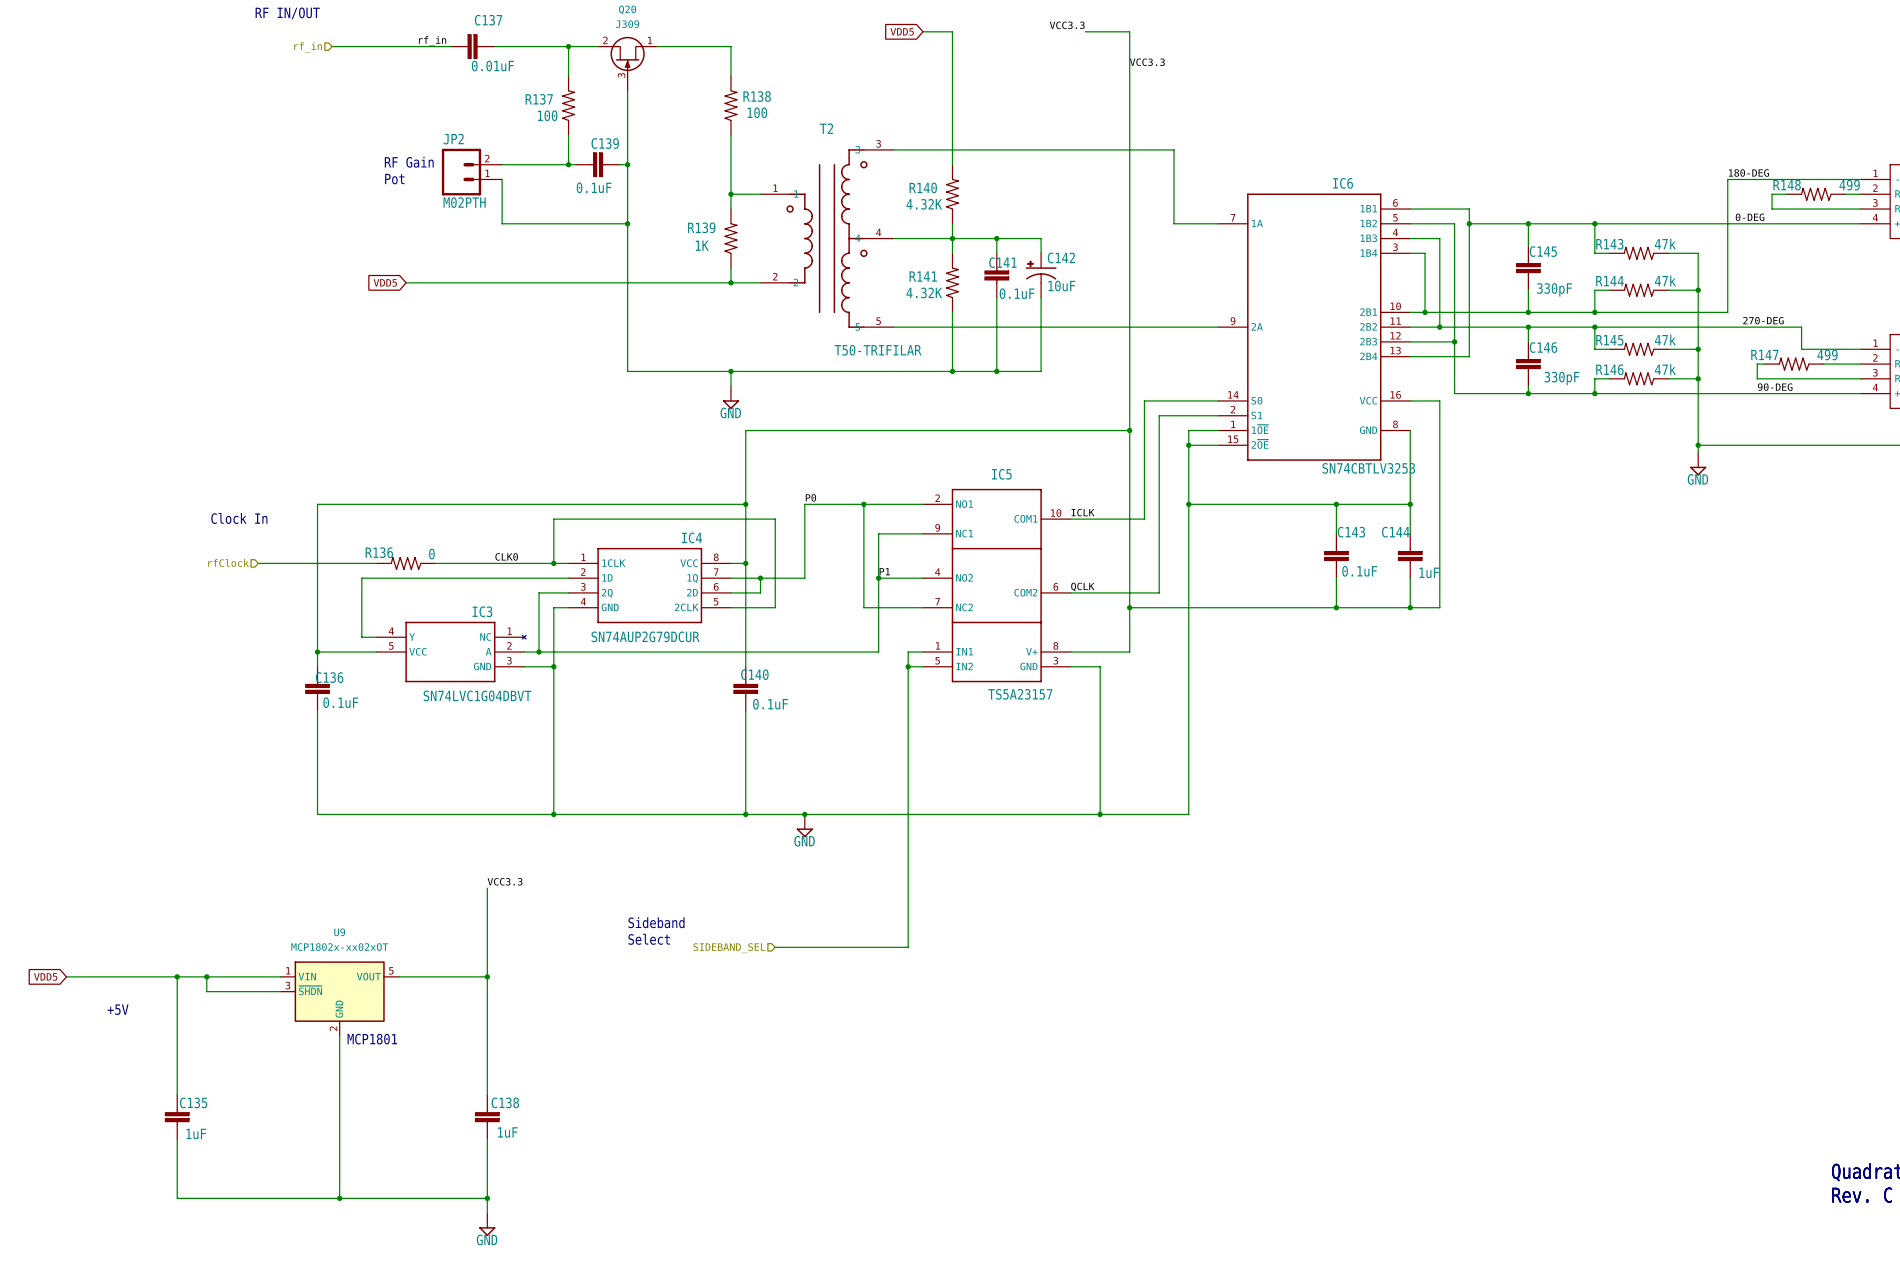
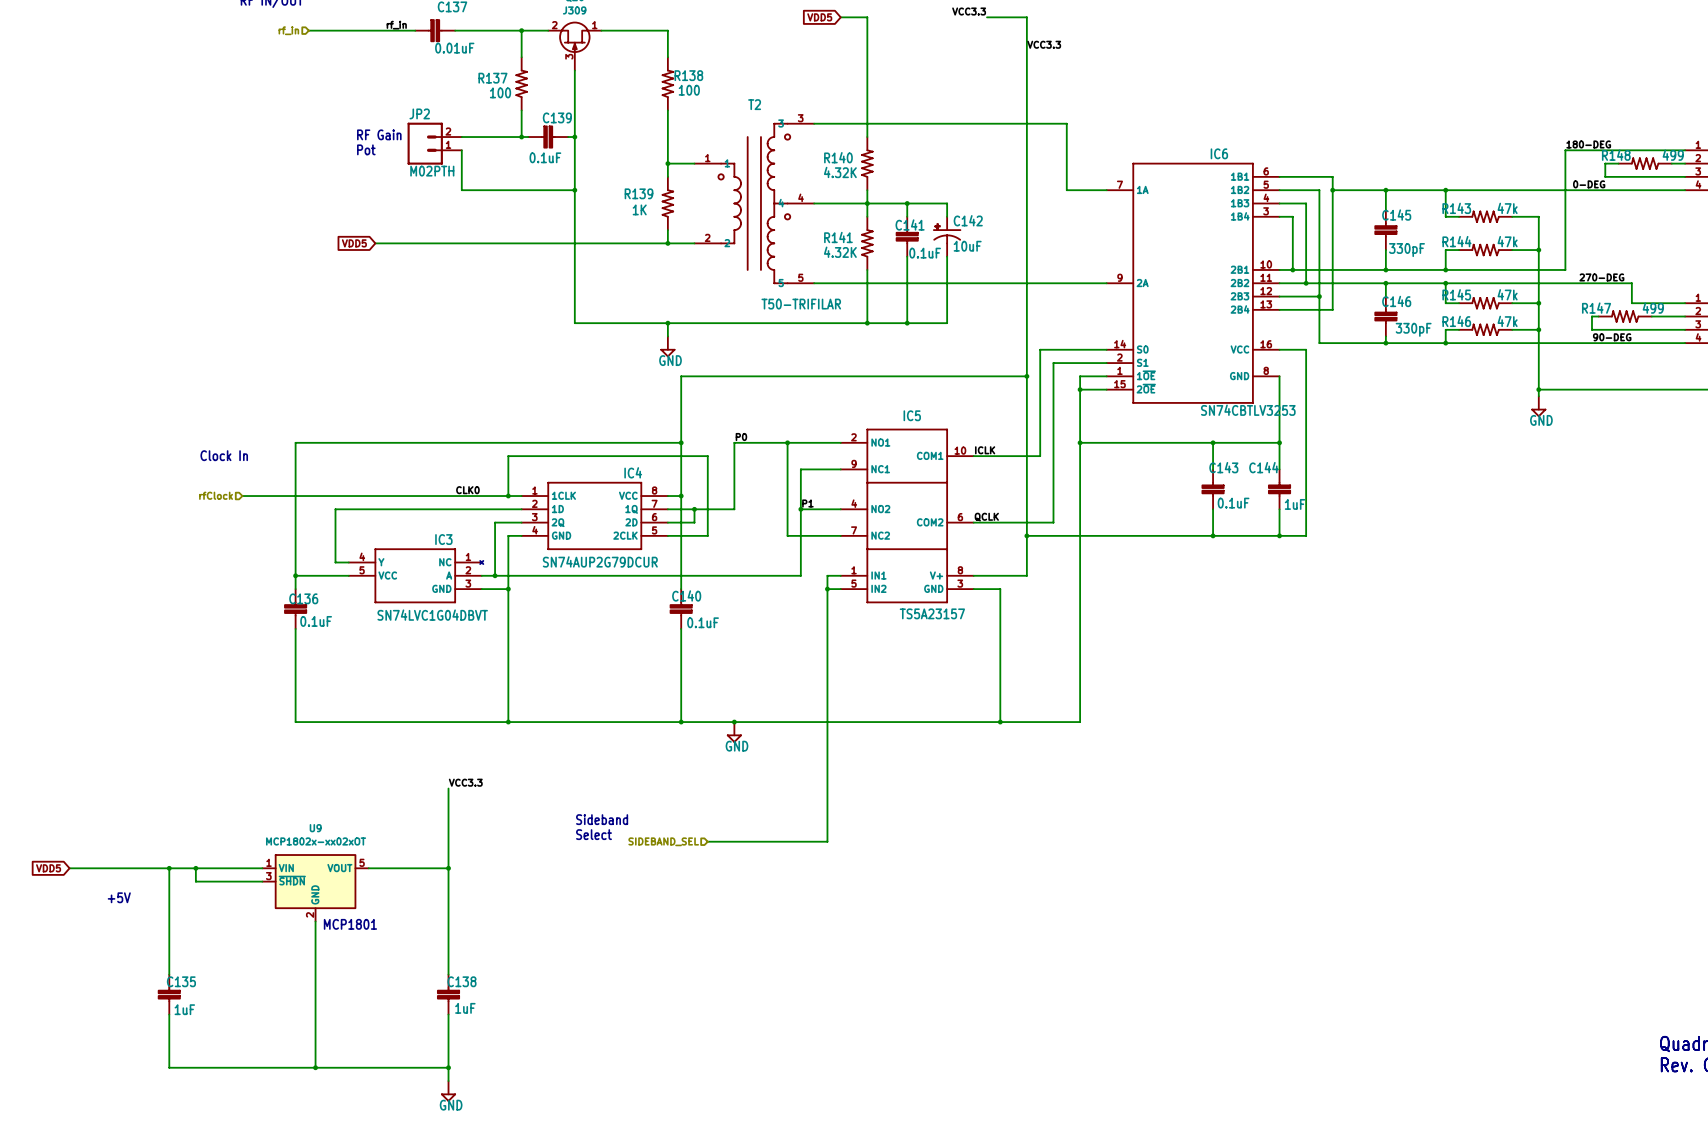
R136: 0 (406, 563) -> none

